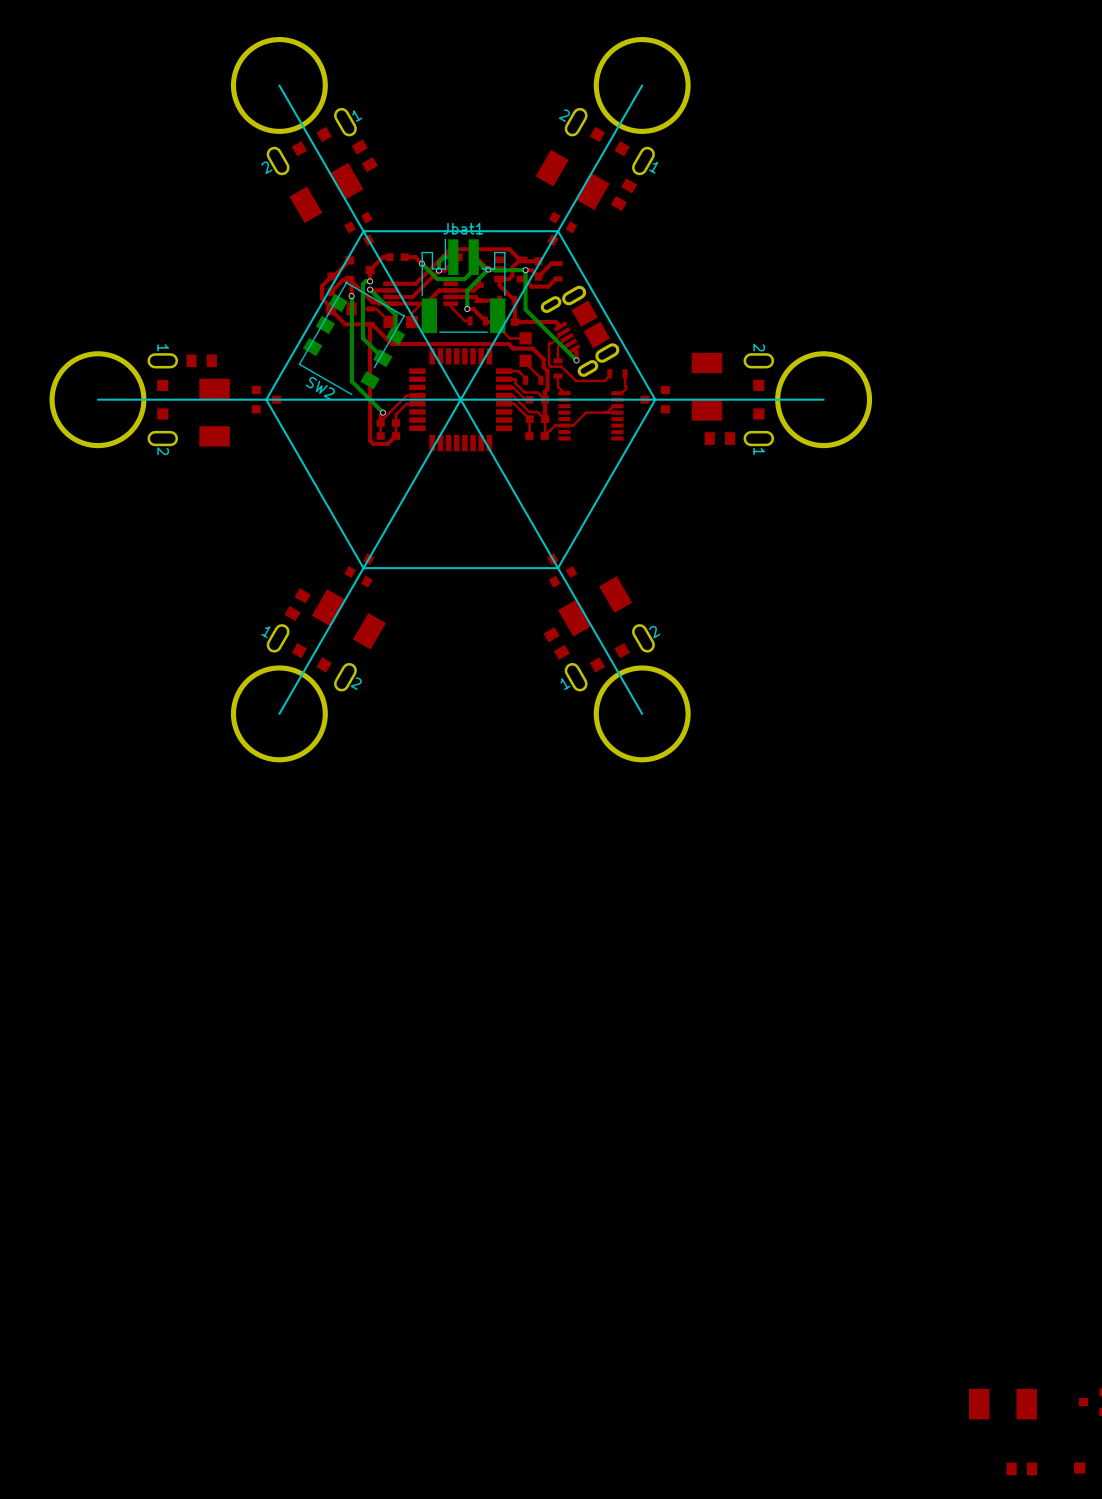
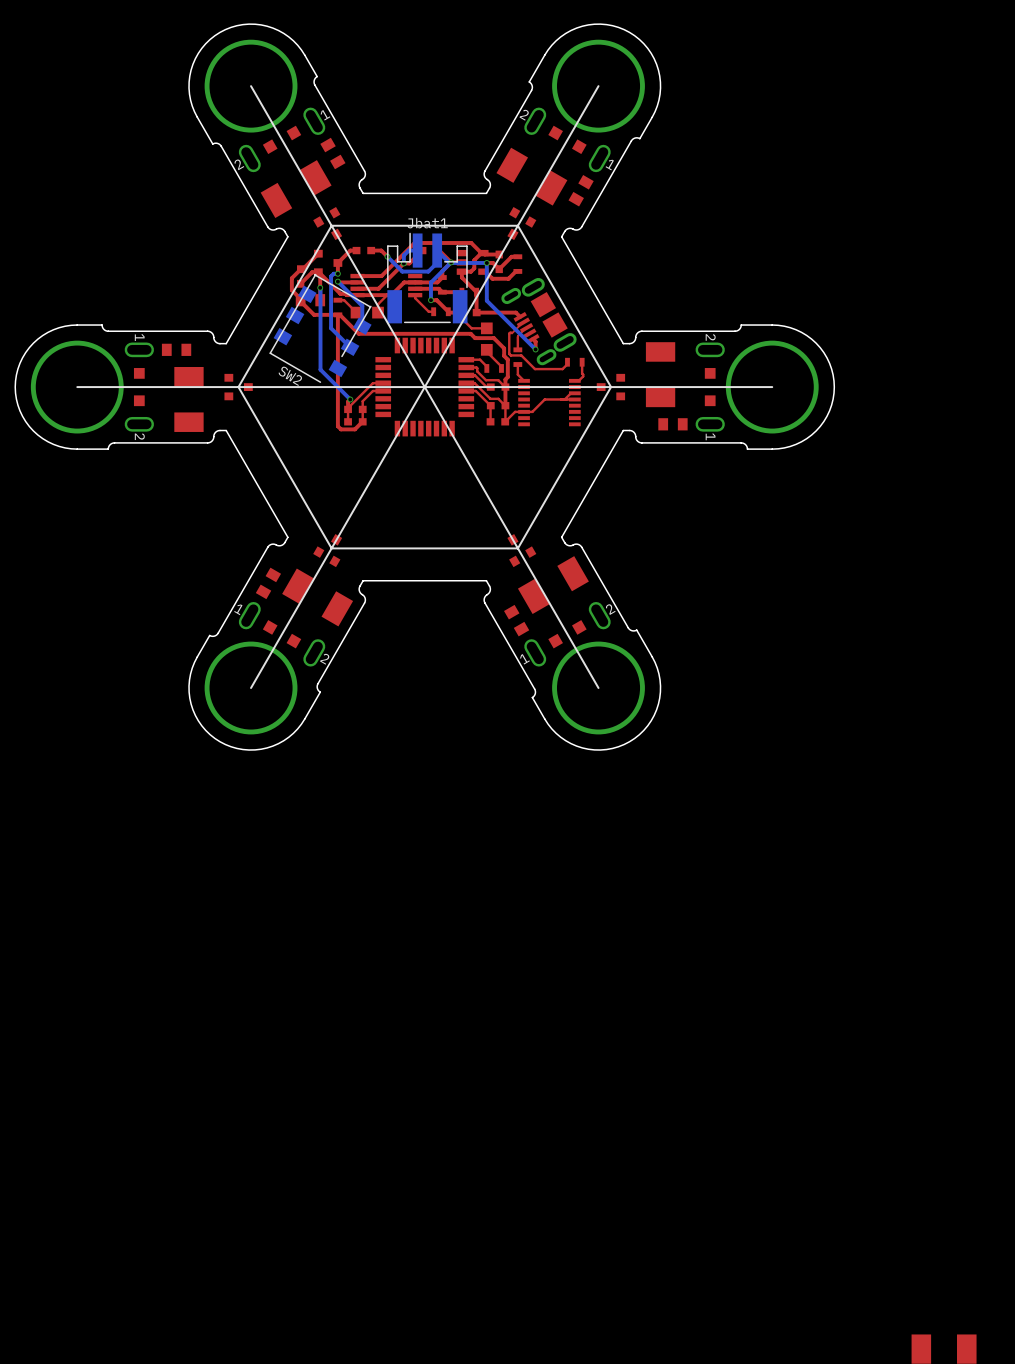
board edge: none -> (741, 325) (784, 326) (806, 335) (820, 347) (826, 357) (831, 369) (834, 387) (831, 405) (826, 416) (820, 426) (806, 438) (790, 446) (778, 448) (747, 449) (745, 444) (741, 442)
board edge: none -> (741, 325) (739, 329) (735, 331) (641, 331) (637, 333) (633, 342) (623, 343) (561, 236) (567, 228) (577, 229) (581, 227) (631, 140) (635, 138) (639, 138) (657, 106) (660, 82) (656, 64) (647, 48) (629, 32) (612, 25) (588, 24) (571, 30) (551, 45) (529, 81) (532, 85) (531, 90) (484, 171) (484, 176) (490, 184) (486, 193) (363, 193) (359, 184) (364, 176) (364, 171) (314, 85) (314, 80) (317, 76) (301, 50) (288, 36) (278, 30) (261, 24) (249, 24) (225, 29) (210, 39) (201, 48) (195, 58) (189, 76) (190, 100) (194, 111) (212, 144) (217, 143) (221, 146) (268, 227) (272, 229) (281, 228) (287, 236) (226, 343) (220, 343)
board edge: none -> (108, 331) (103, 329) (102, 325) (65, 326) (48, 332) (29, 347) (17, 369) (15, 387) (17, 405) (29, 426) (37, 435) (53, 444) (77, 449) (108, 449) (110, 444) (114, 442) (208, 442) (212, 440) (216, 431) (226, 430) (287, 537) (281, 545) (272, 544) (268, 546) (218, 633) (214, 636) (209, 635) (194, 662) (190, 673) (189, 698) (198, 720) (214, 738) (236, 748) (255, 749) (272, 746) (288, 737) (301, 724) (320, 692) (317, 688) (318, 683) (364, 602) (364, 597) (359, 590) (363, 580) (486, 580) (490, 590) (484, 597) (484, 602) (534, 689) (535, 693) (532, 697) (551, 728) (571, 743) (594, 749) (612, 748) (634, 738) (647, 725) (656, 709) (660, 685) (657, 668) (636, 630) (632, 630) (628, 627) (581, 546) (577, 544) (567, 545) (561, 537) (623, 430) (632, 431) (637, 440) (641, 442)
board edge: none -> (108, 331) (208, 331) (212, 333) (215, 341) (220, 343)
board edge: none -> (741, 442) (641, 442)

